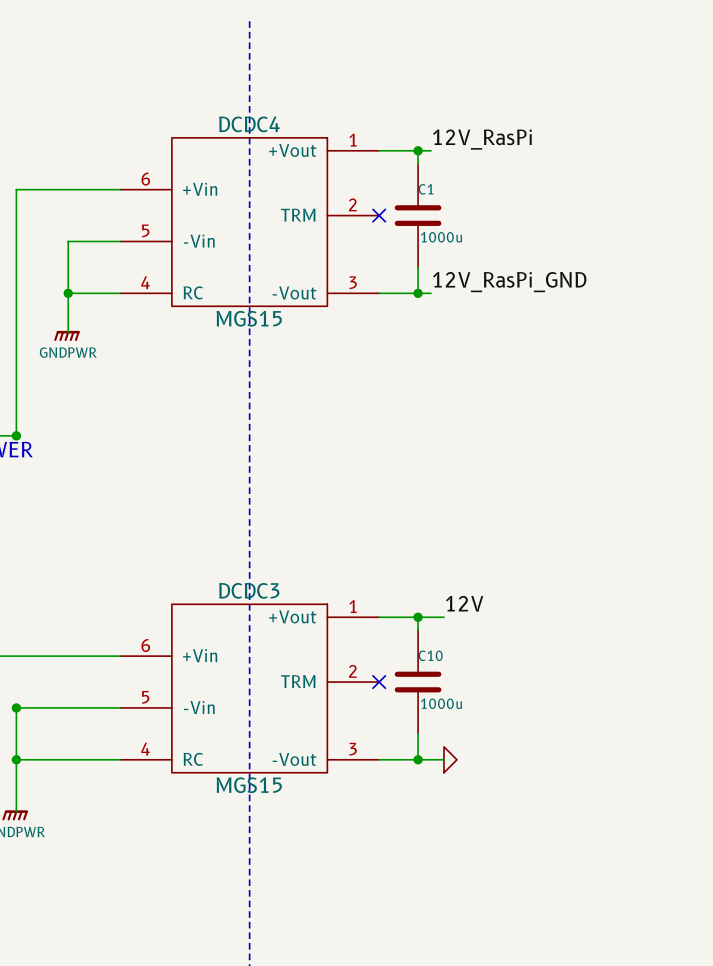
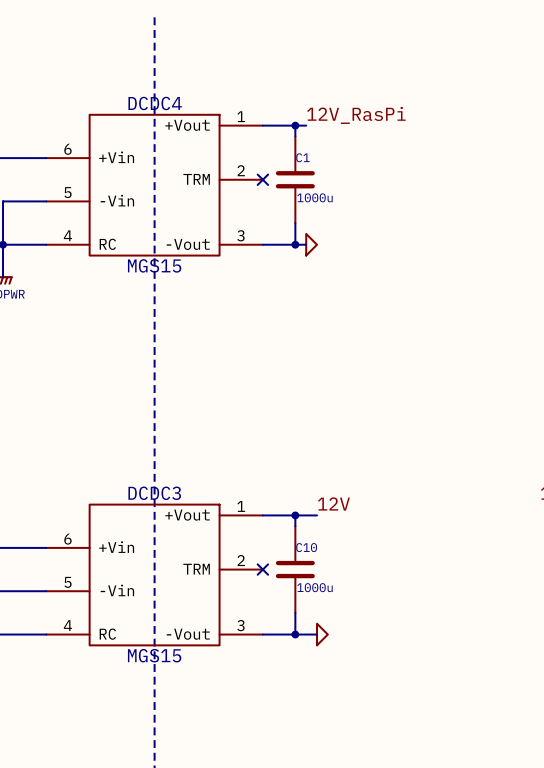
label: 12V_RasPi_GND (509, 282) -> none
power symbol: none -> (311, 244)

